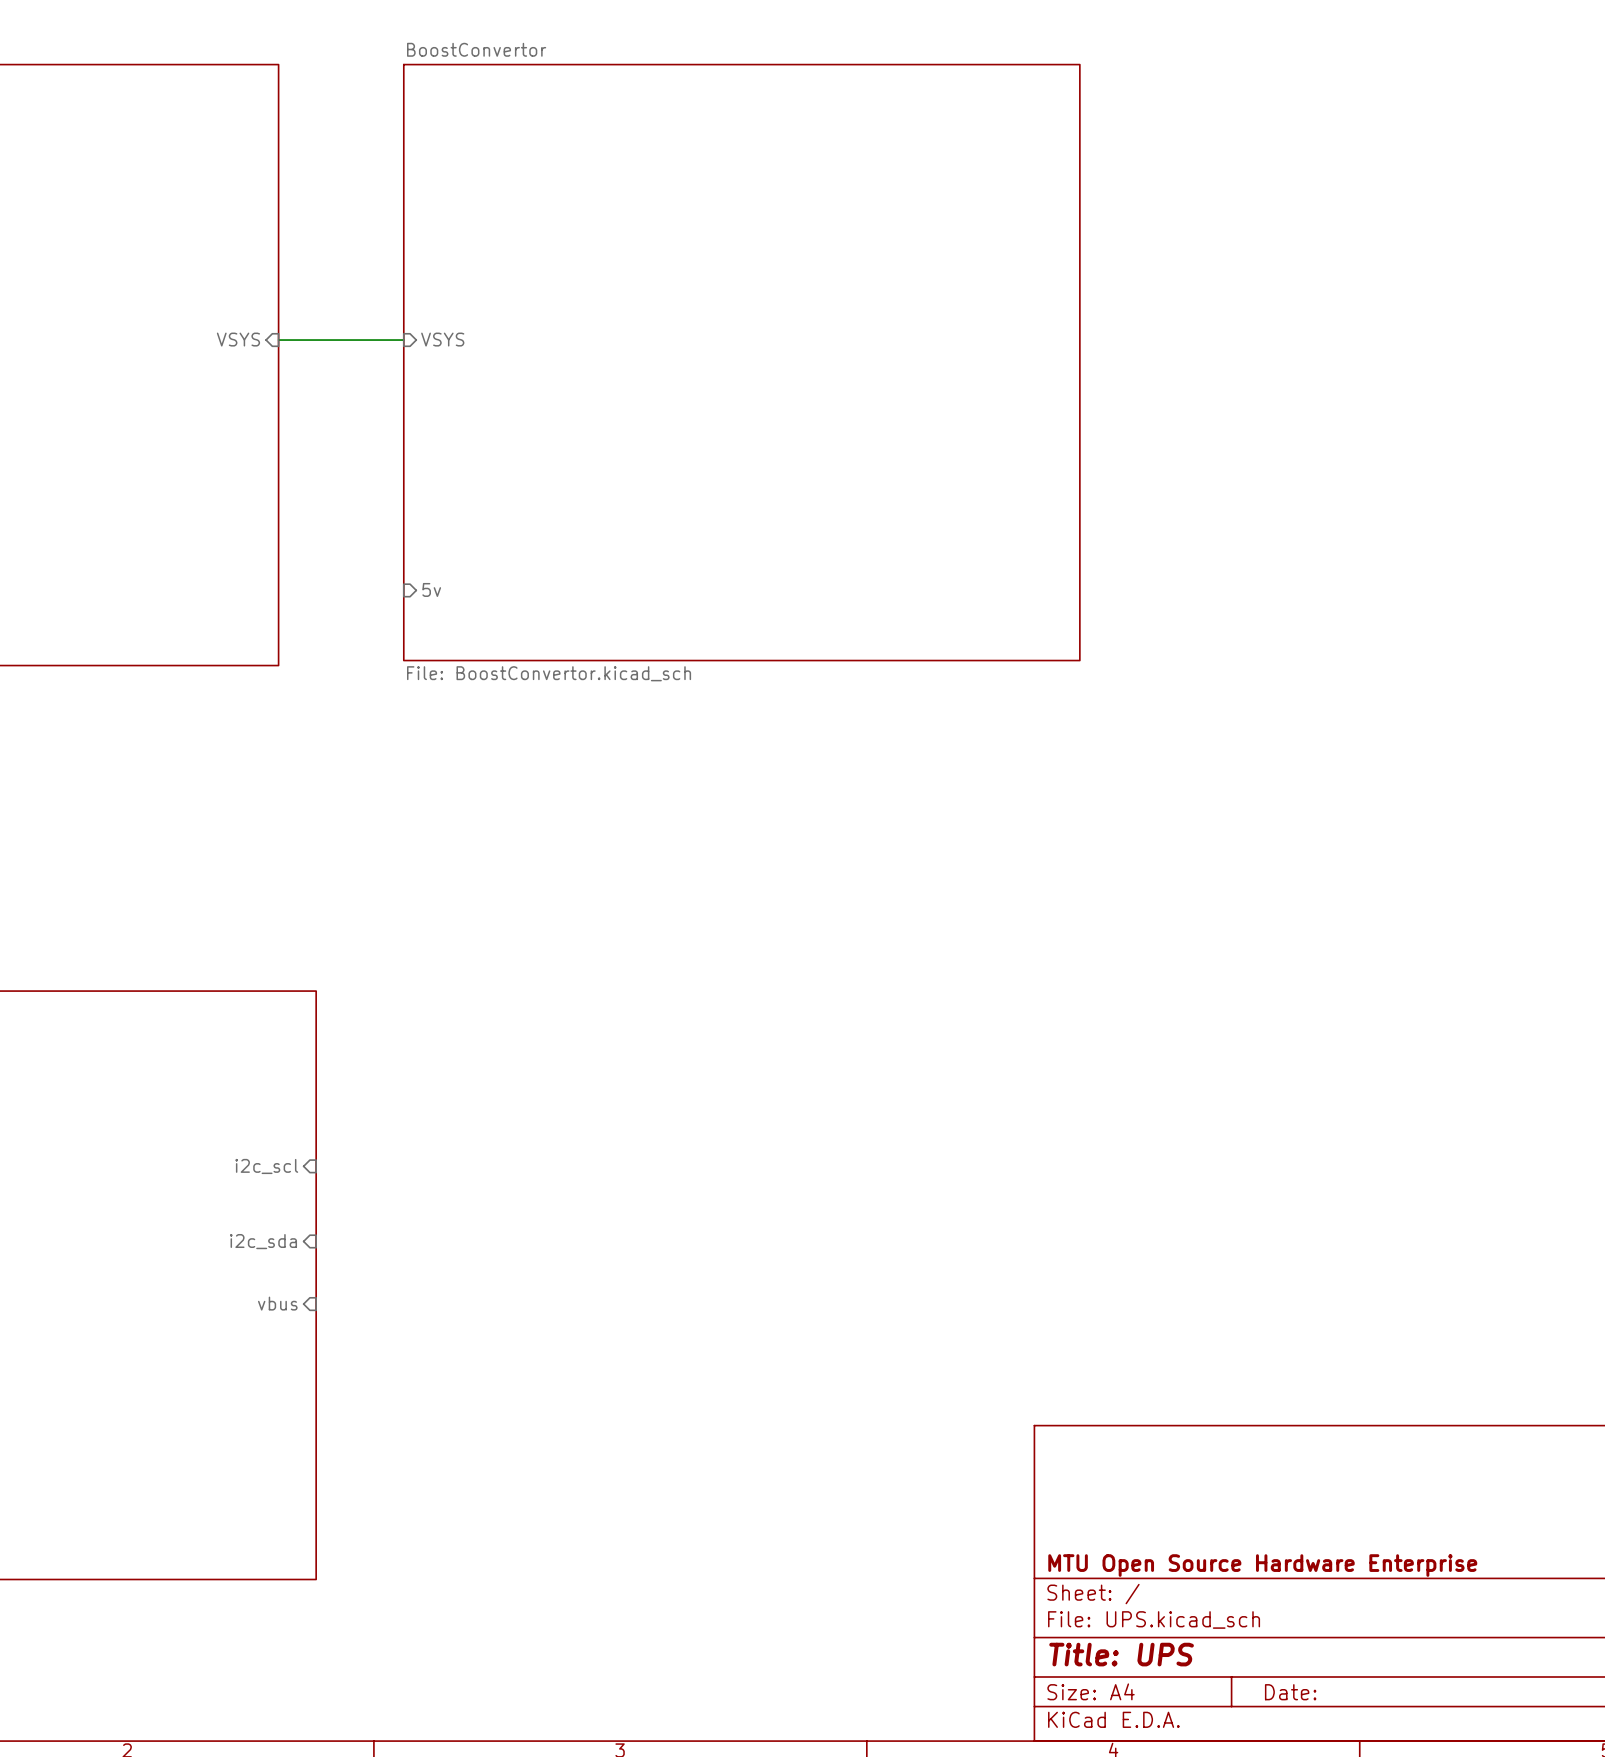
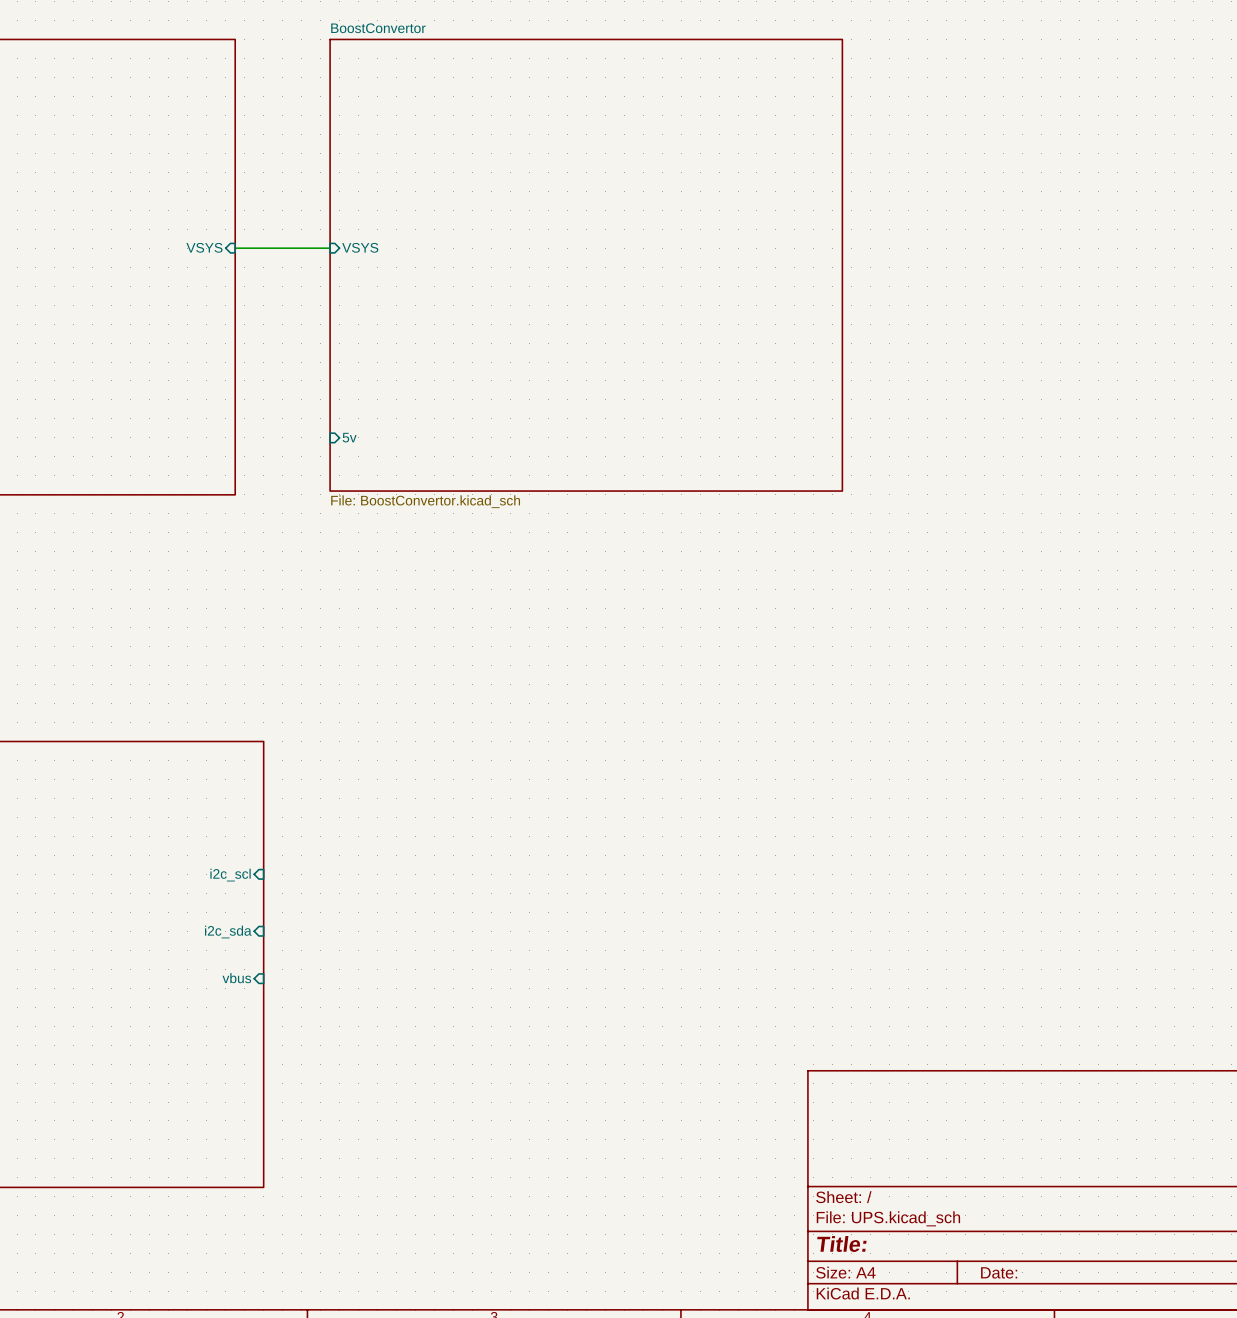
title block: MTU Open Source Hardware Enterprise (1262, 1565) -> none
title block: Title: UPS (1121, 1654) -> Title: (841, 1243)

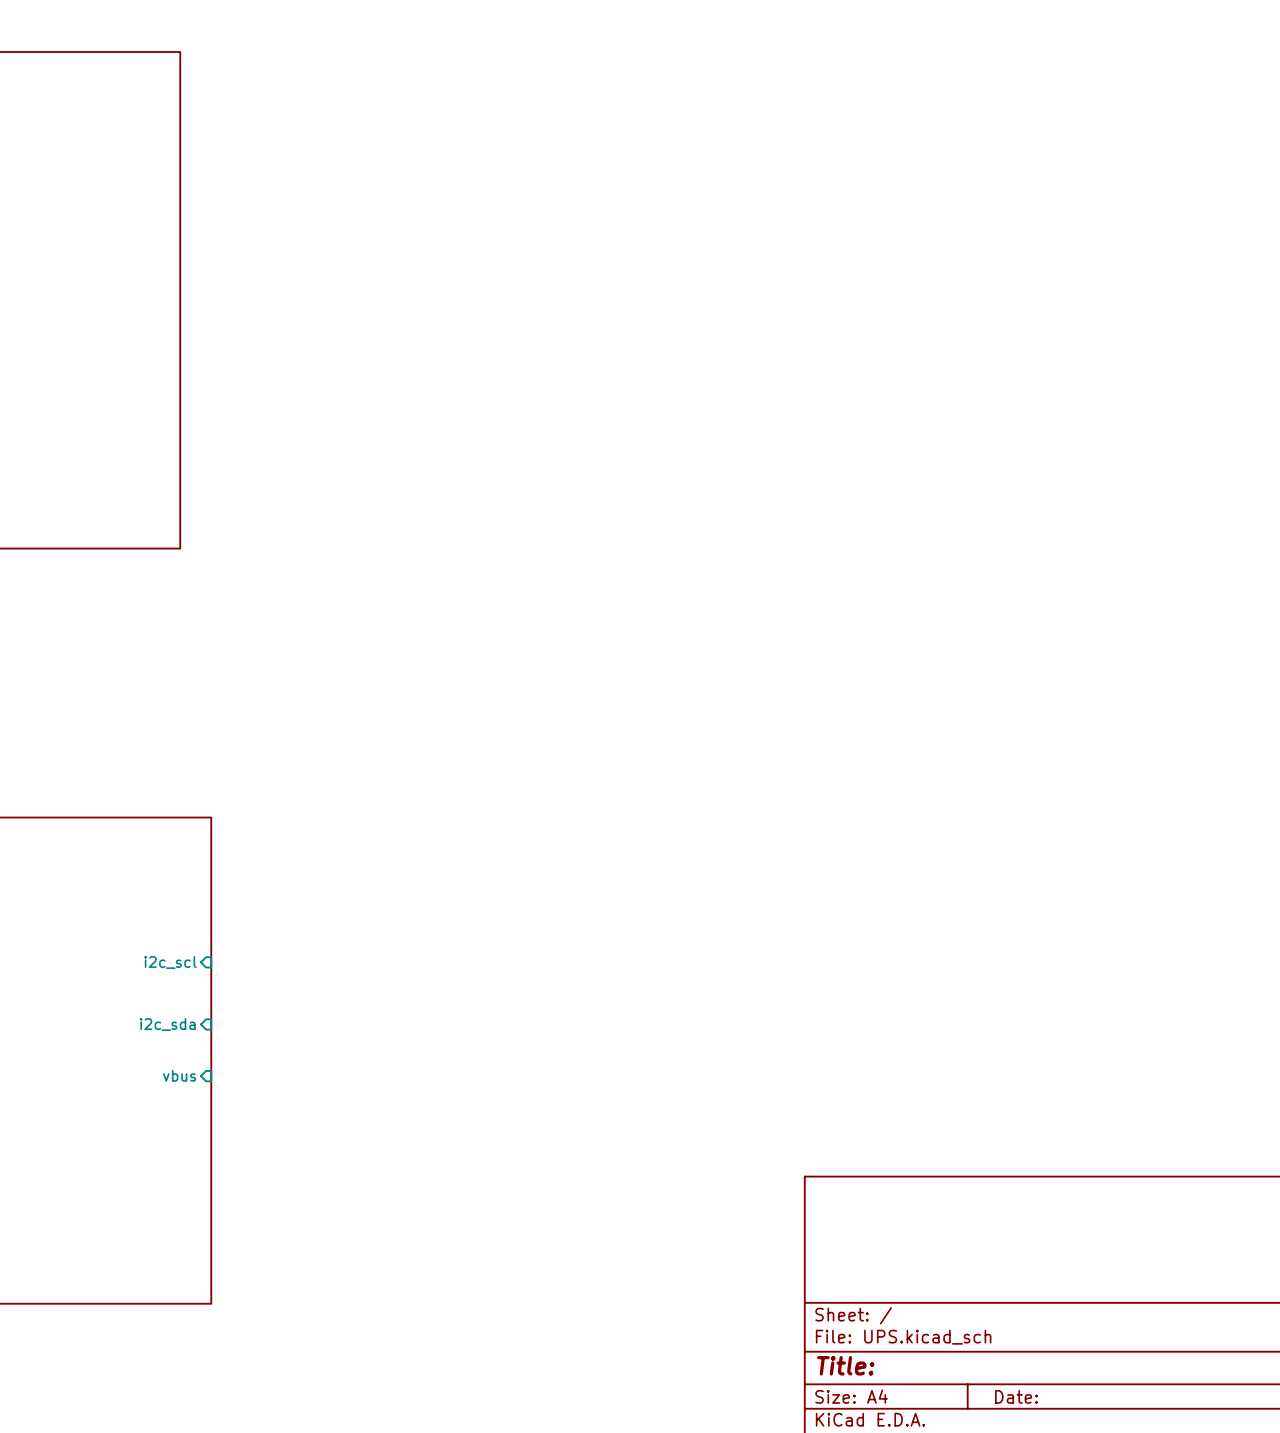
sheet pin: VSYS (204, 247) -> none
sheet pin: VSYS (360, 247) -> none
wire: (235, 248) (330, 248) -> none
sheet BoostConvertor: File: BoostConvertor.kicad_sch (586, 265) -> none
sheet pin: 5v (349, 437) -> none

